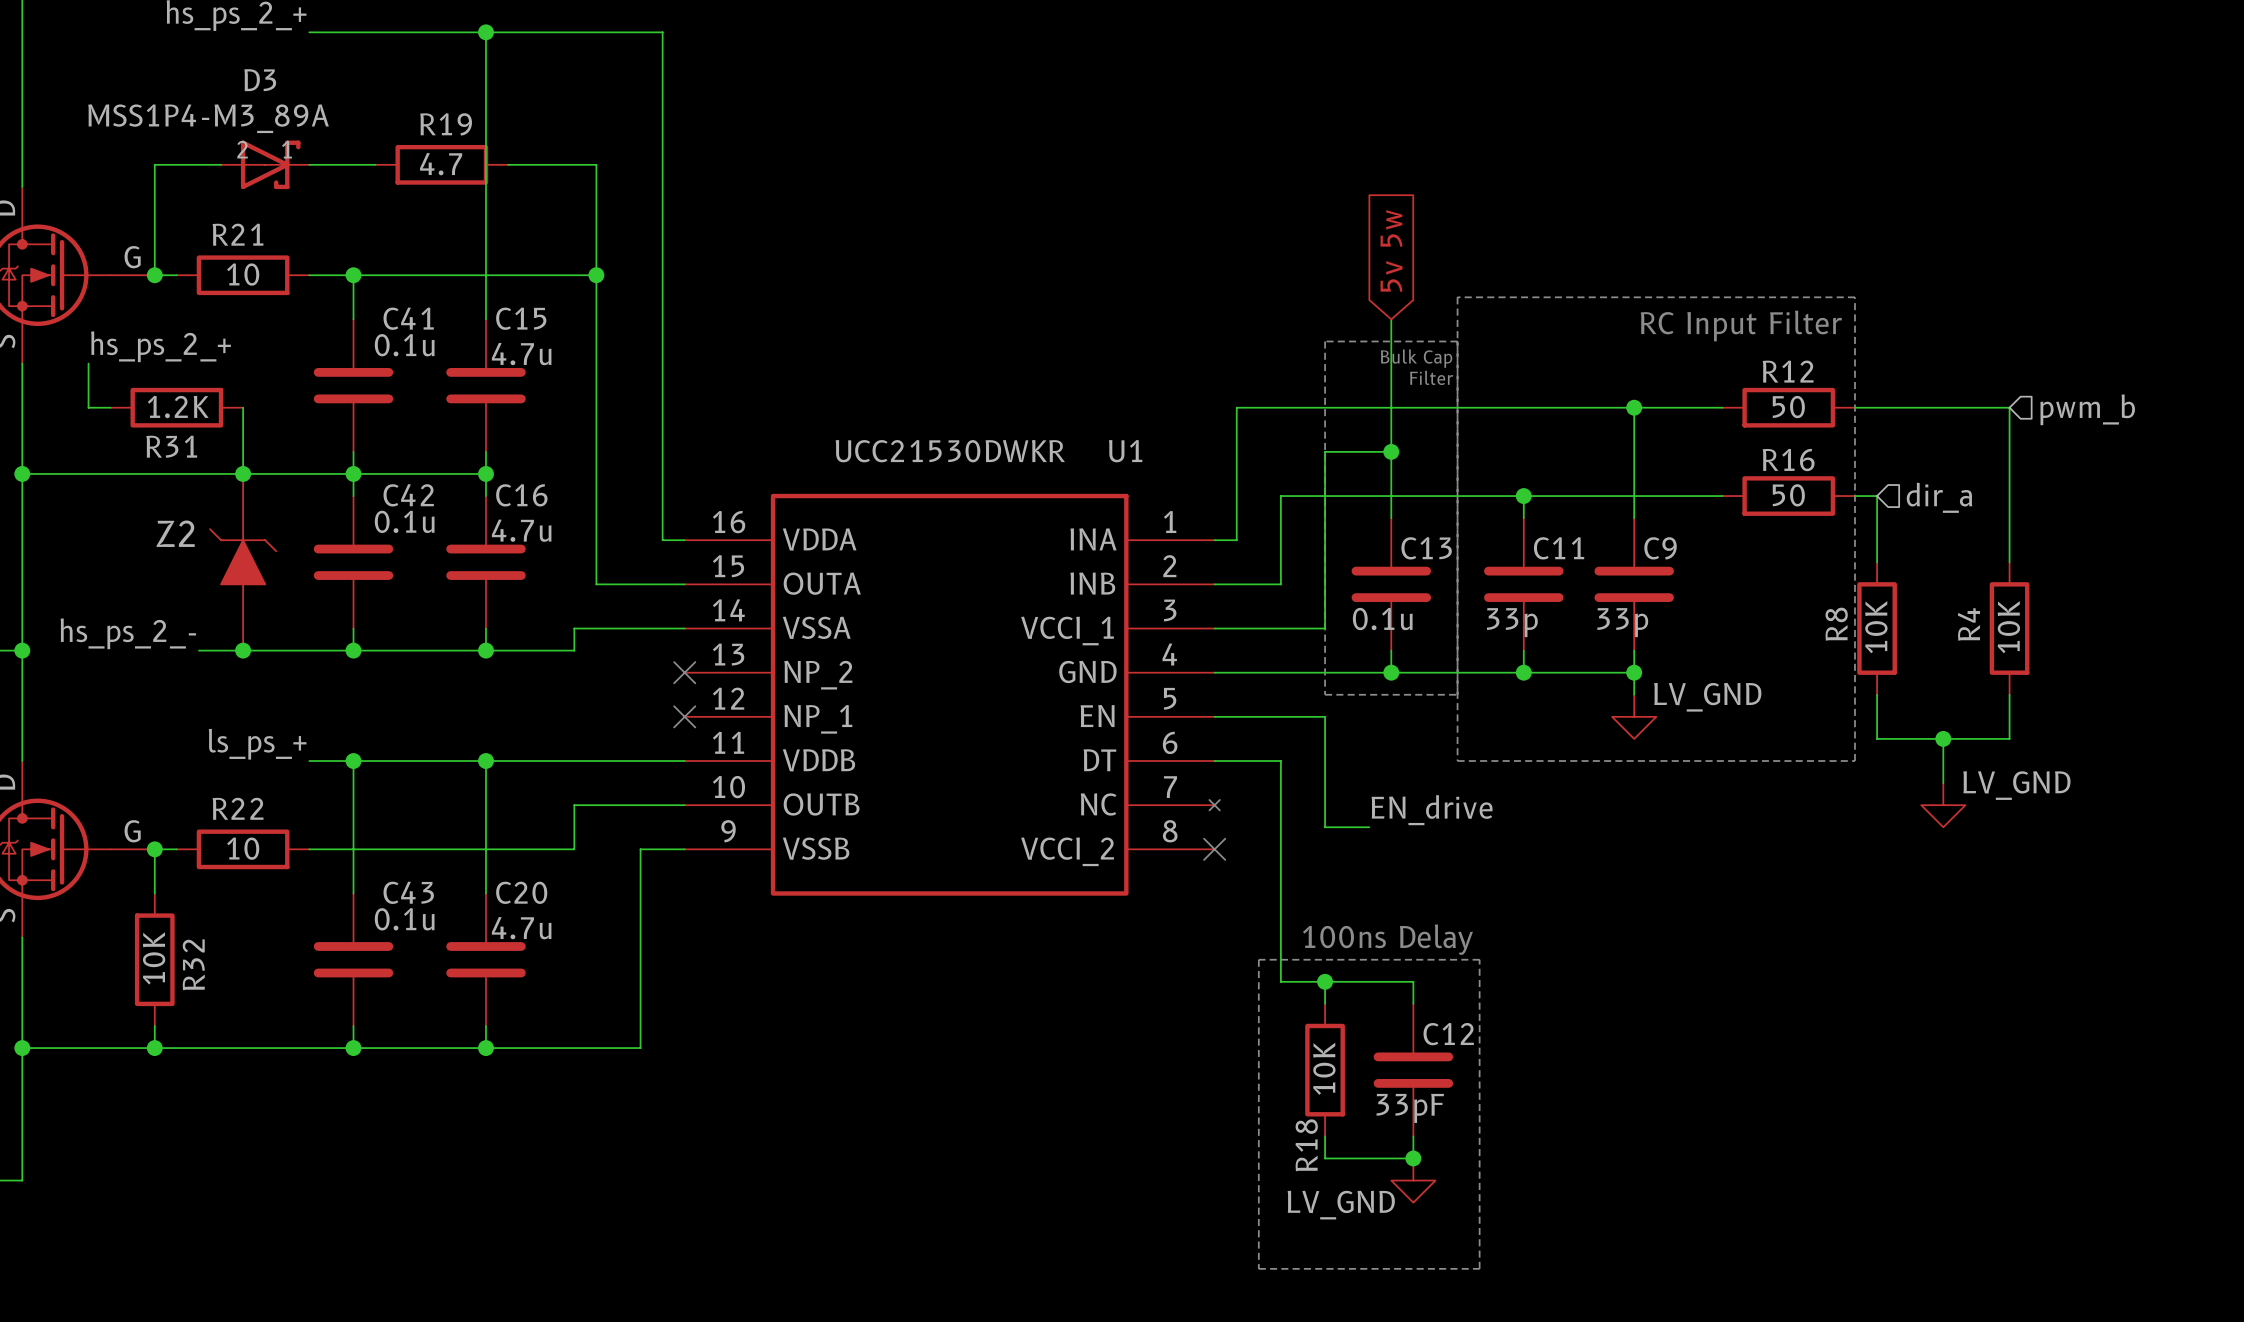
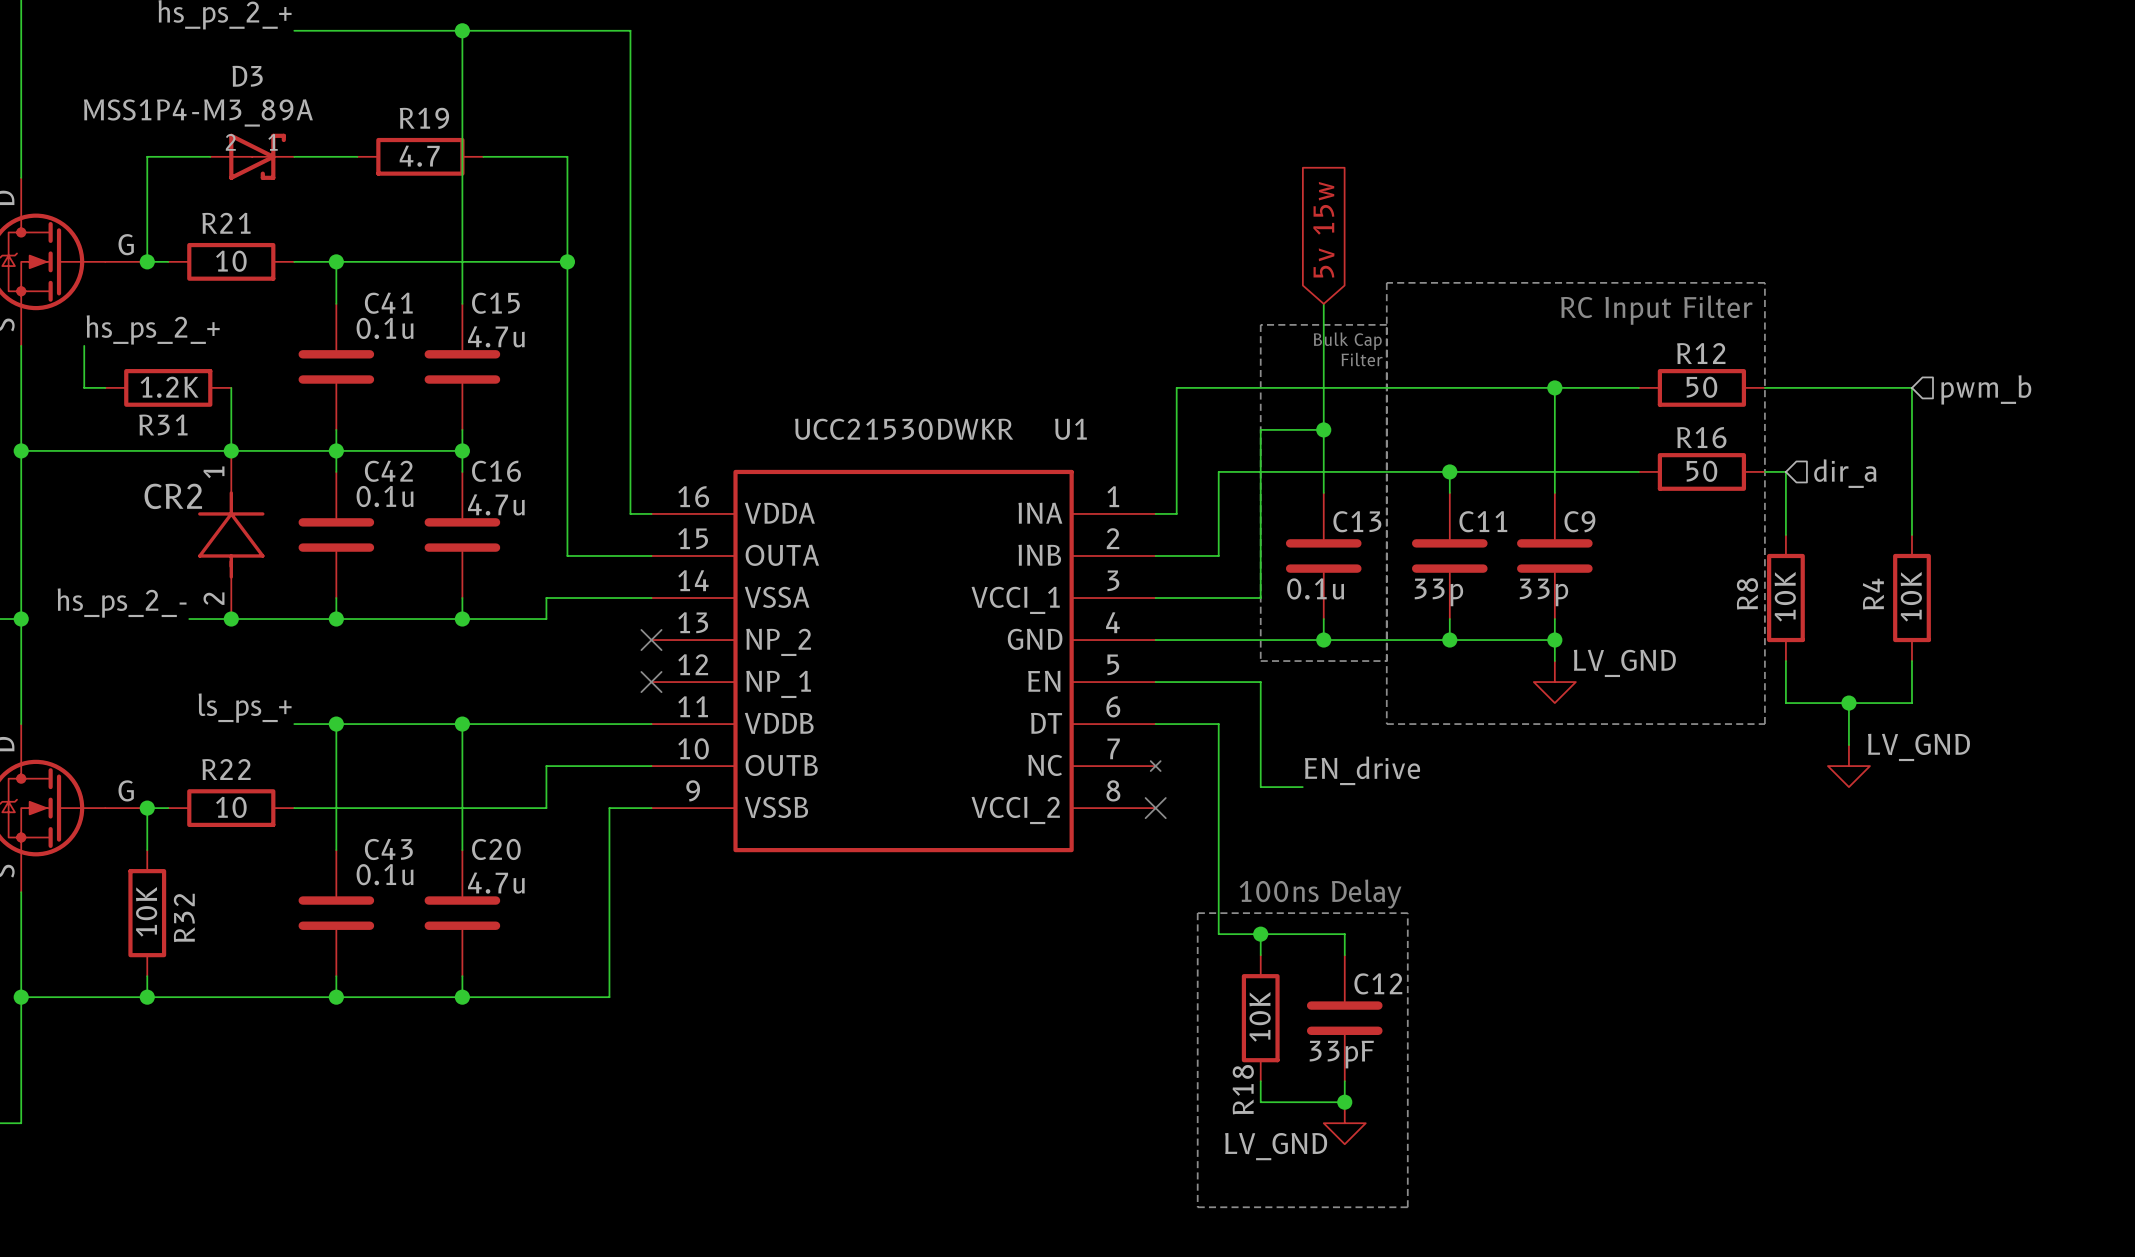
global label: 5v 5w (1391, 250) -> 5v 15w (1323, 229)
Z2: (243, 562) -> none
CR2: none -> (231, 534)

